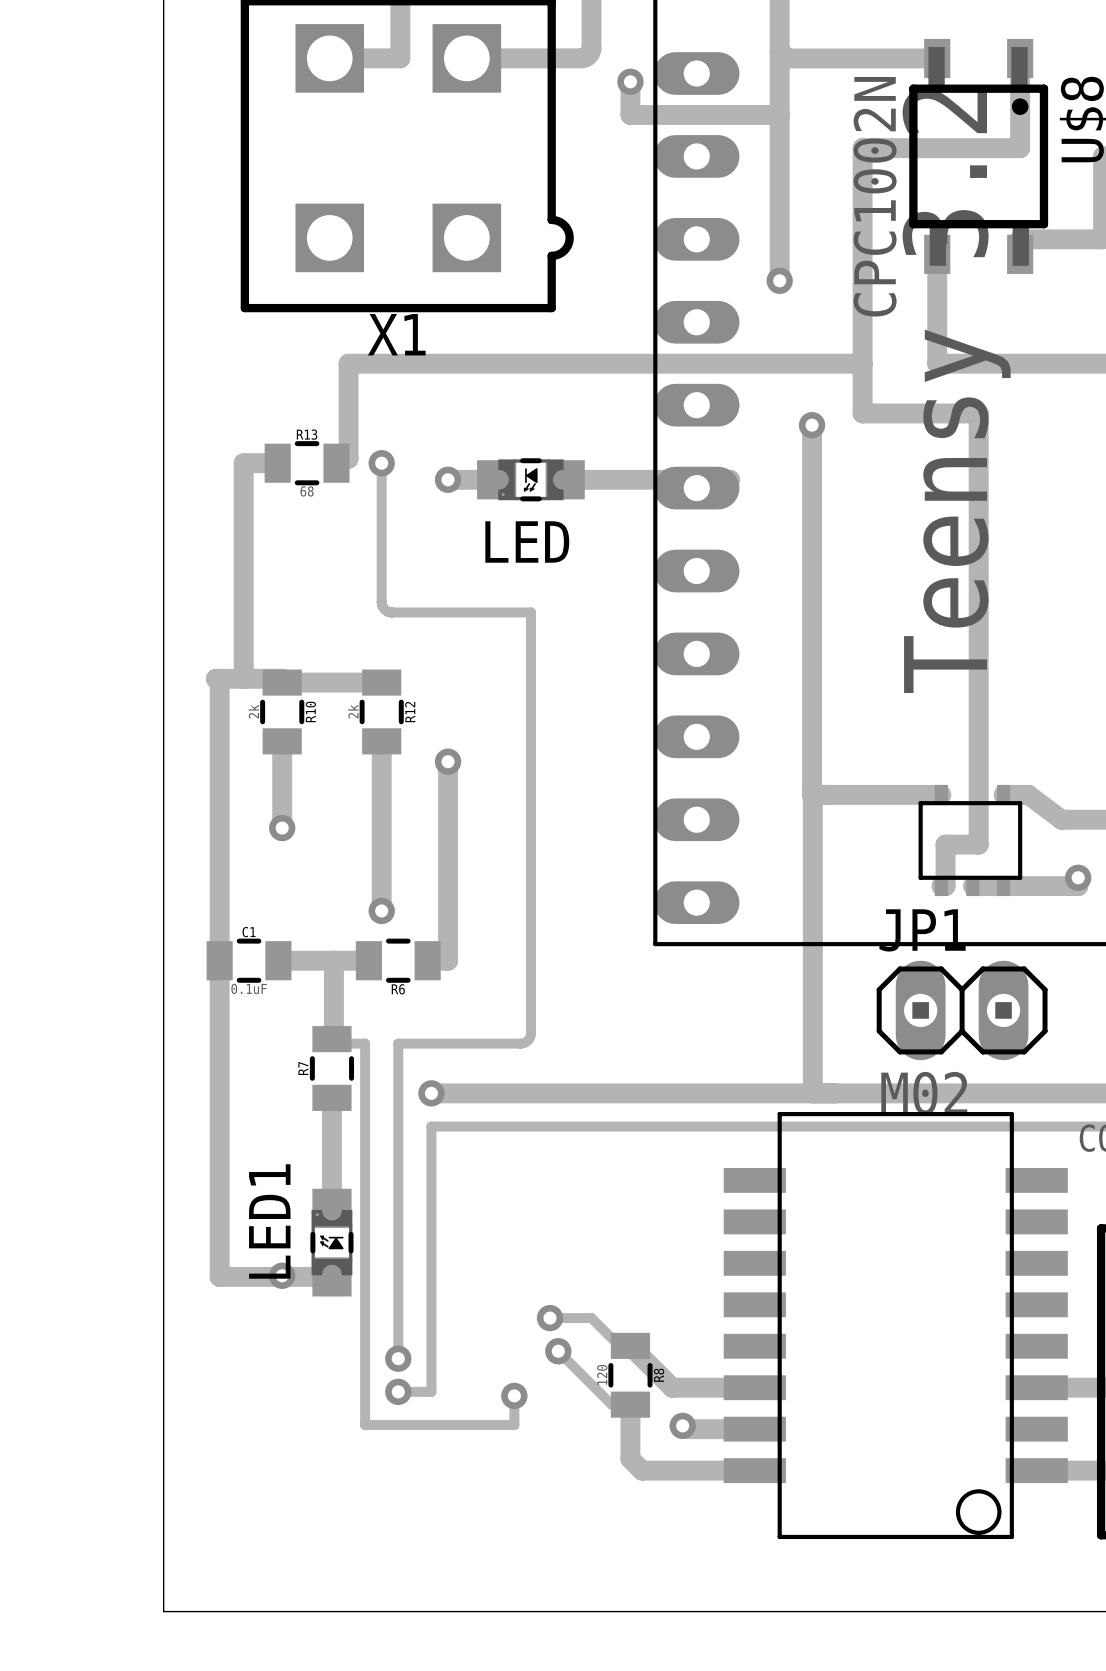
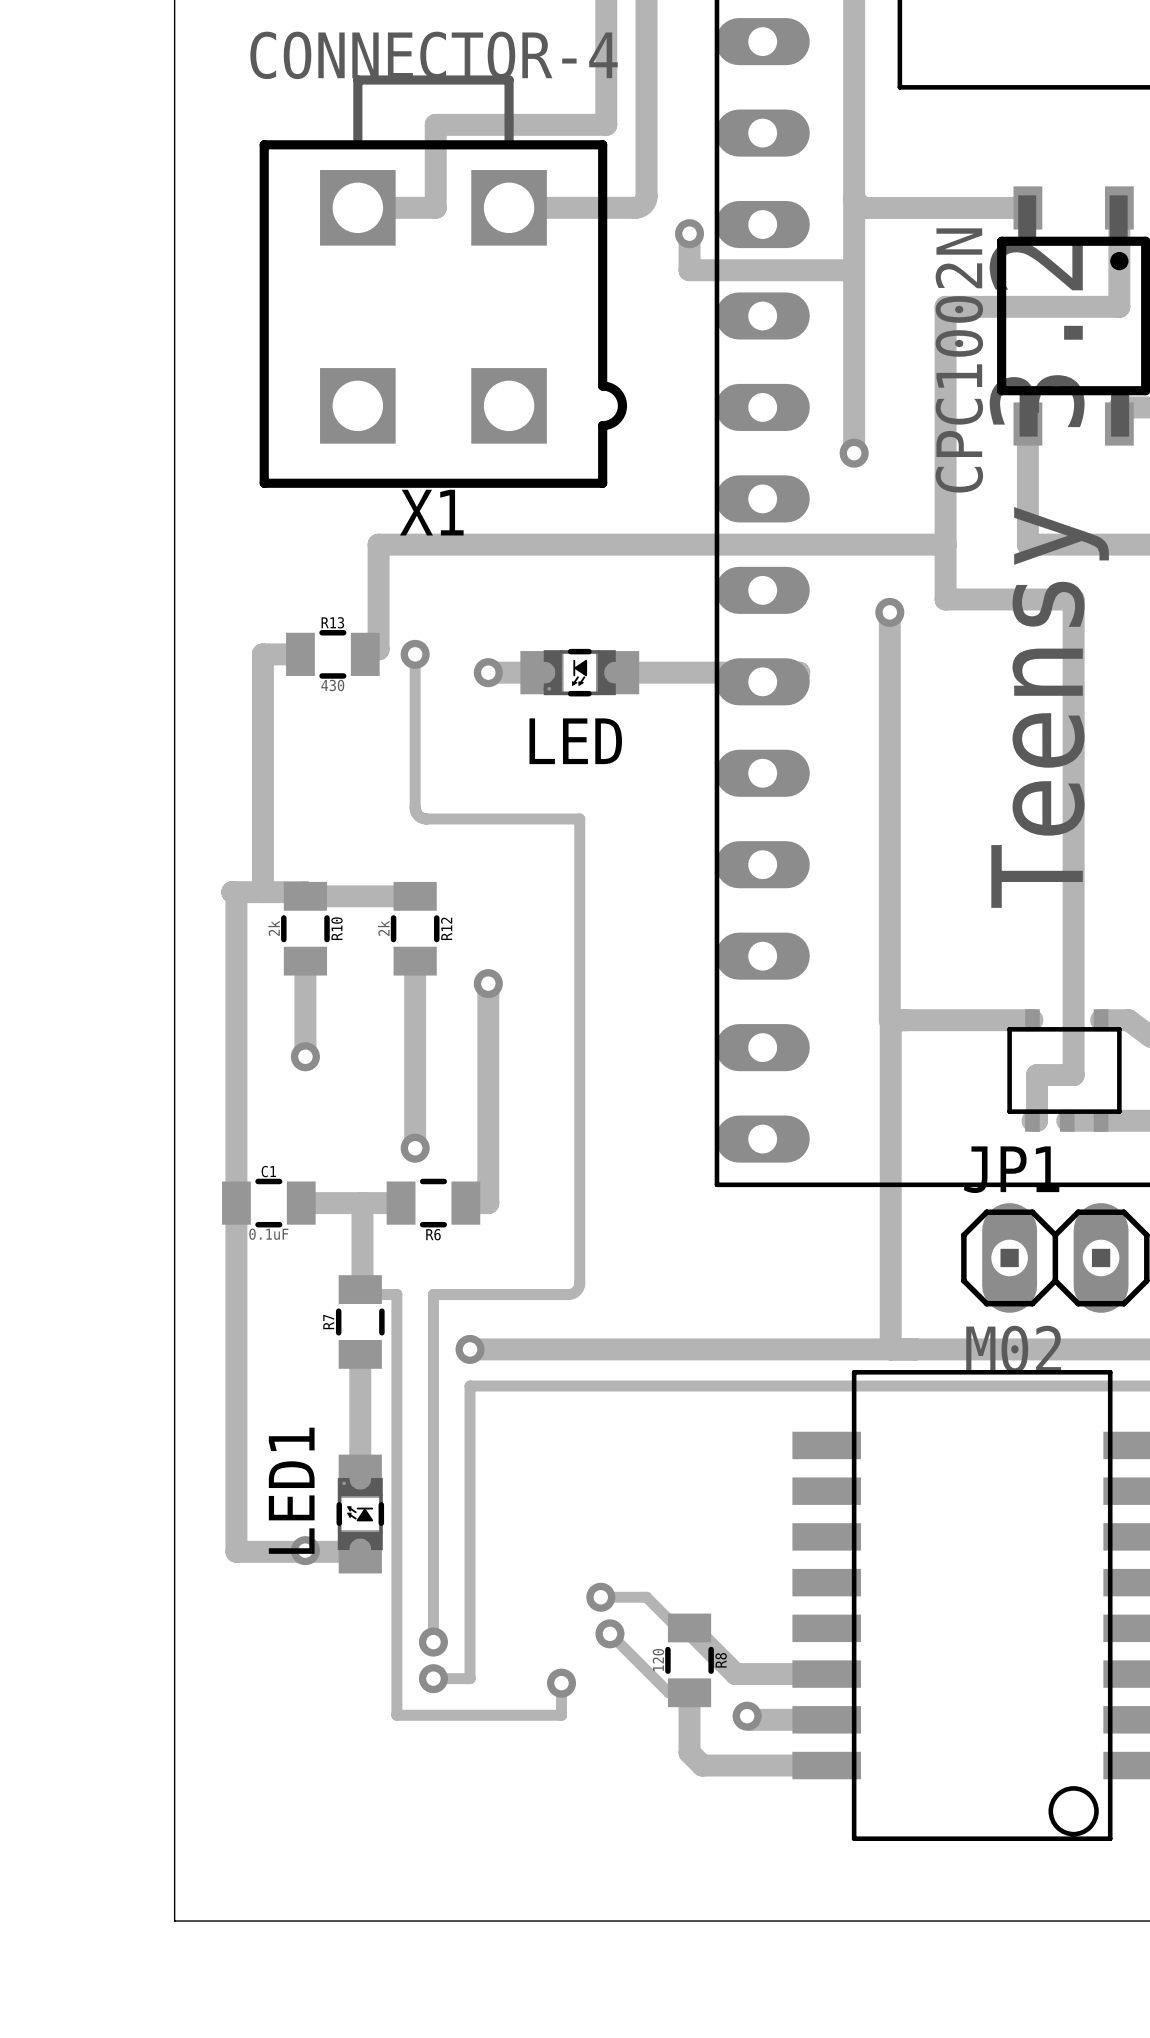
R13 value: 68 (307, 491) -> 430 (332, 685)

